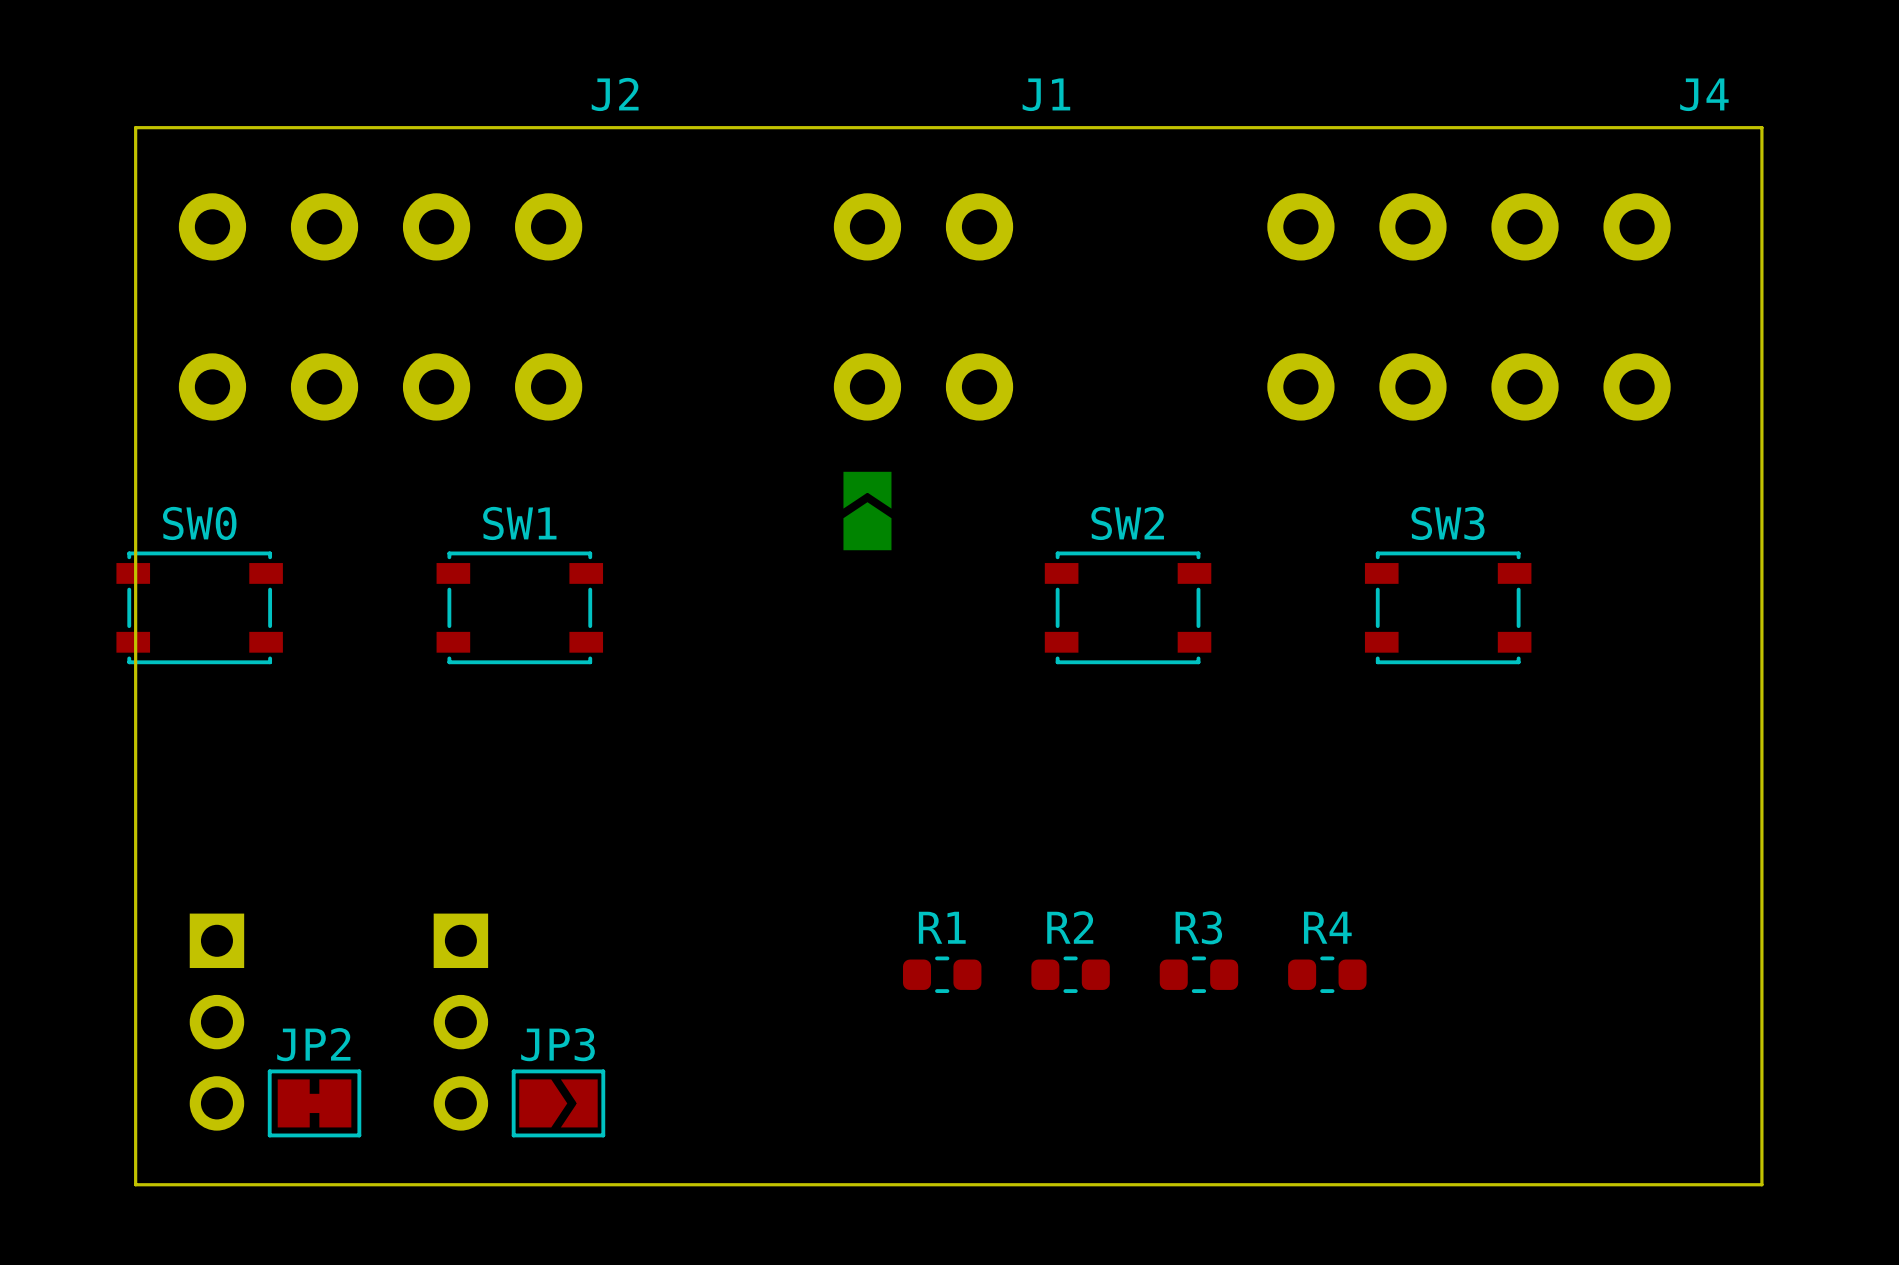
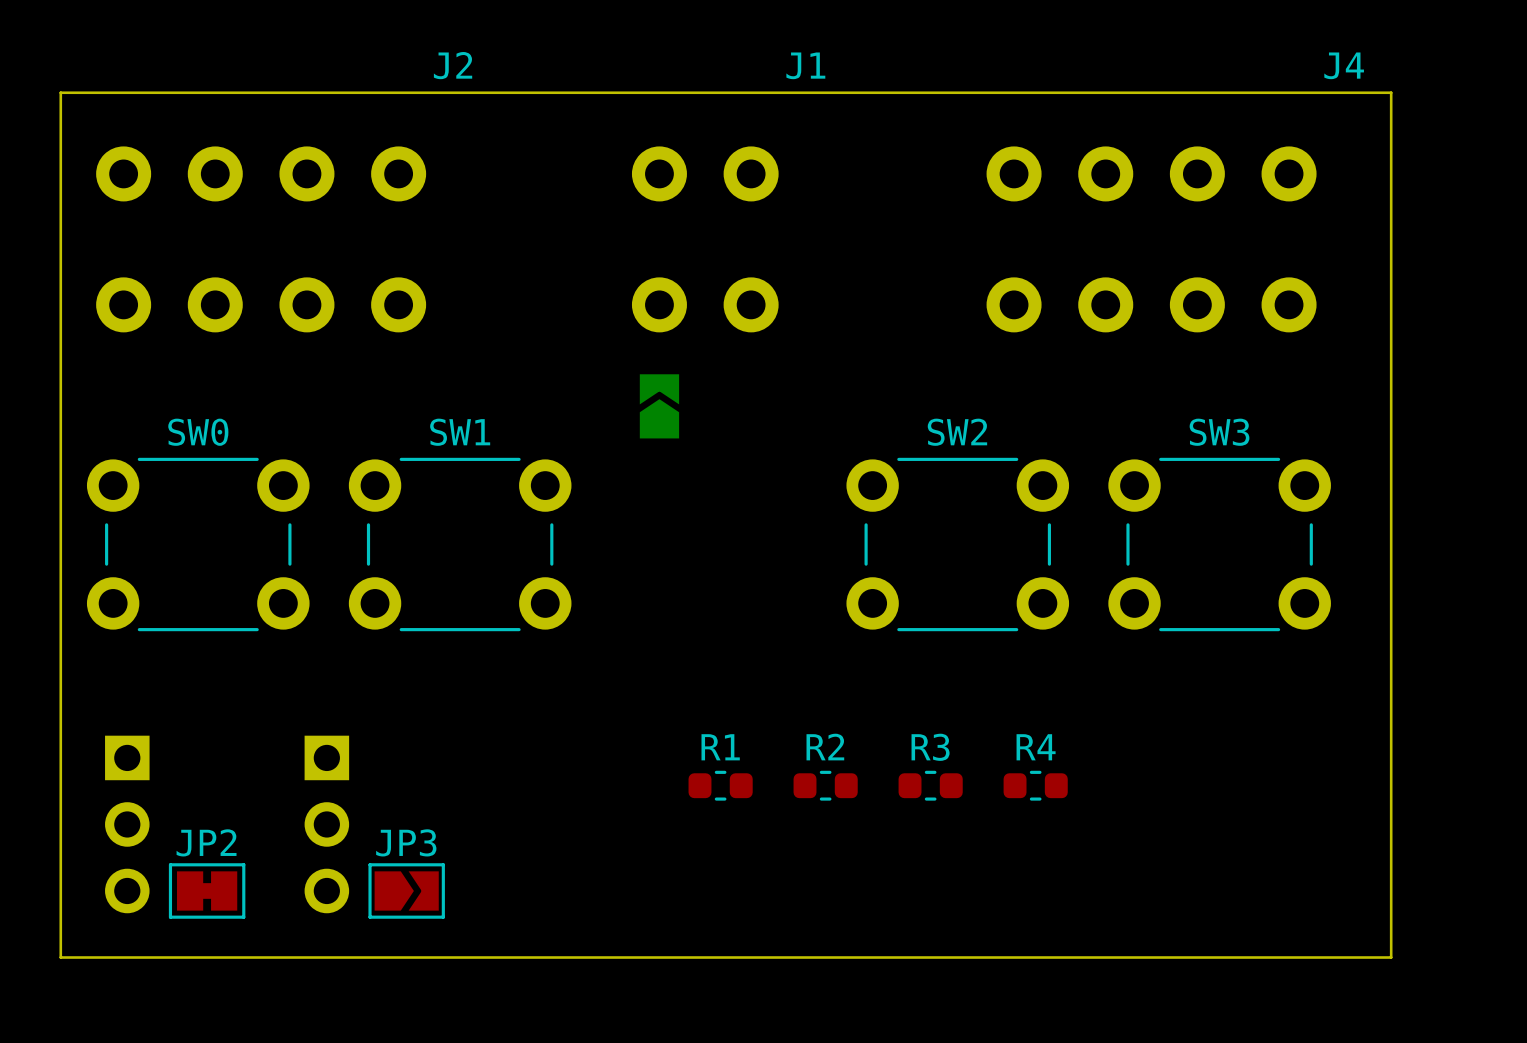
SW0 footprint: [116, 551, 283, 665] -> [86, 457, 310, 632]
SW1 footprint: [436, 551, 604, 665] -> [348, 457, 572, 632]
SW2 footprint: [1044, 551, 1212, 665] -> [846, 457, 1070, 632]
SW3 footprint: [1364, 551, 1532, 665] -> [1108, 457, 1331, 632]

